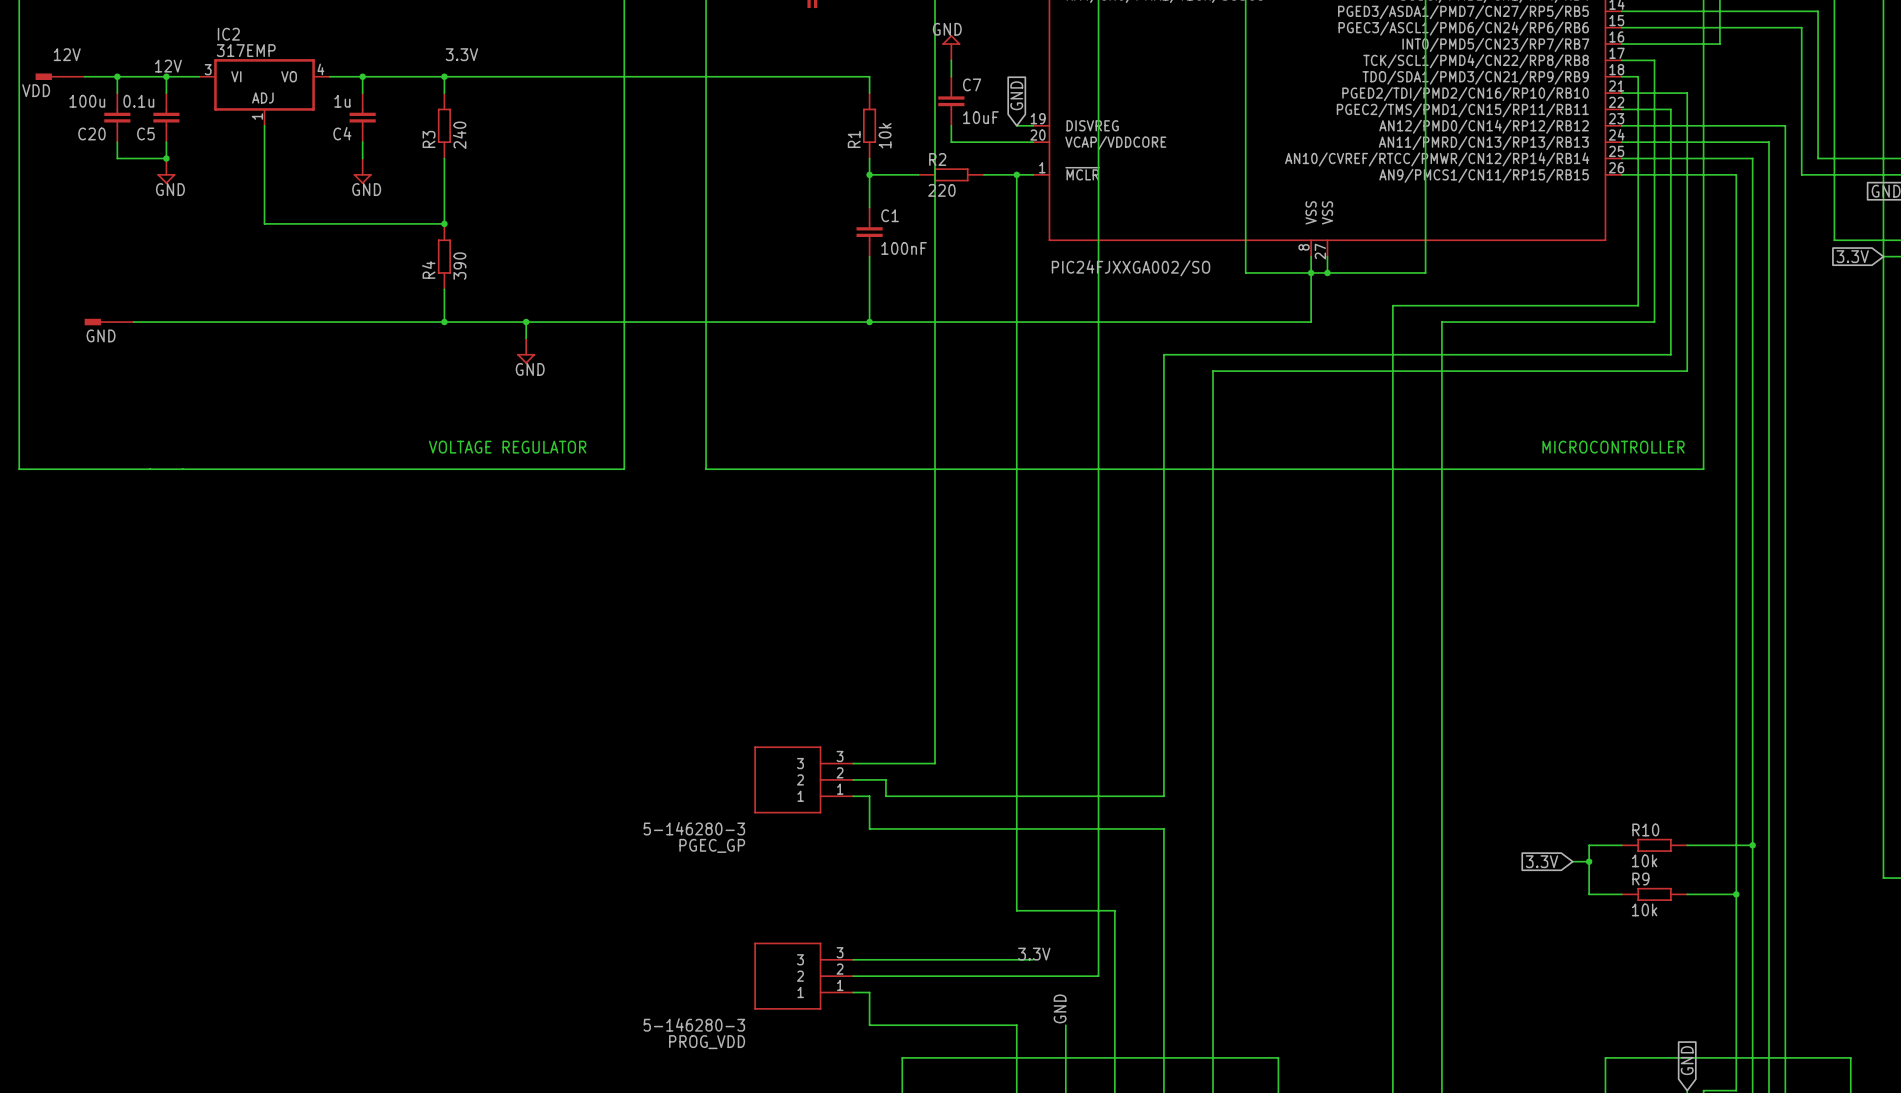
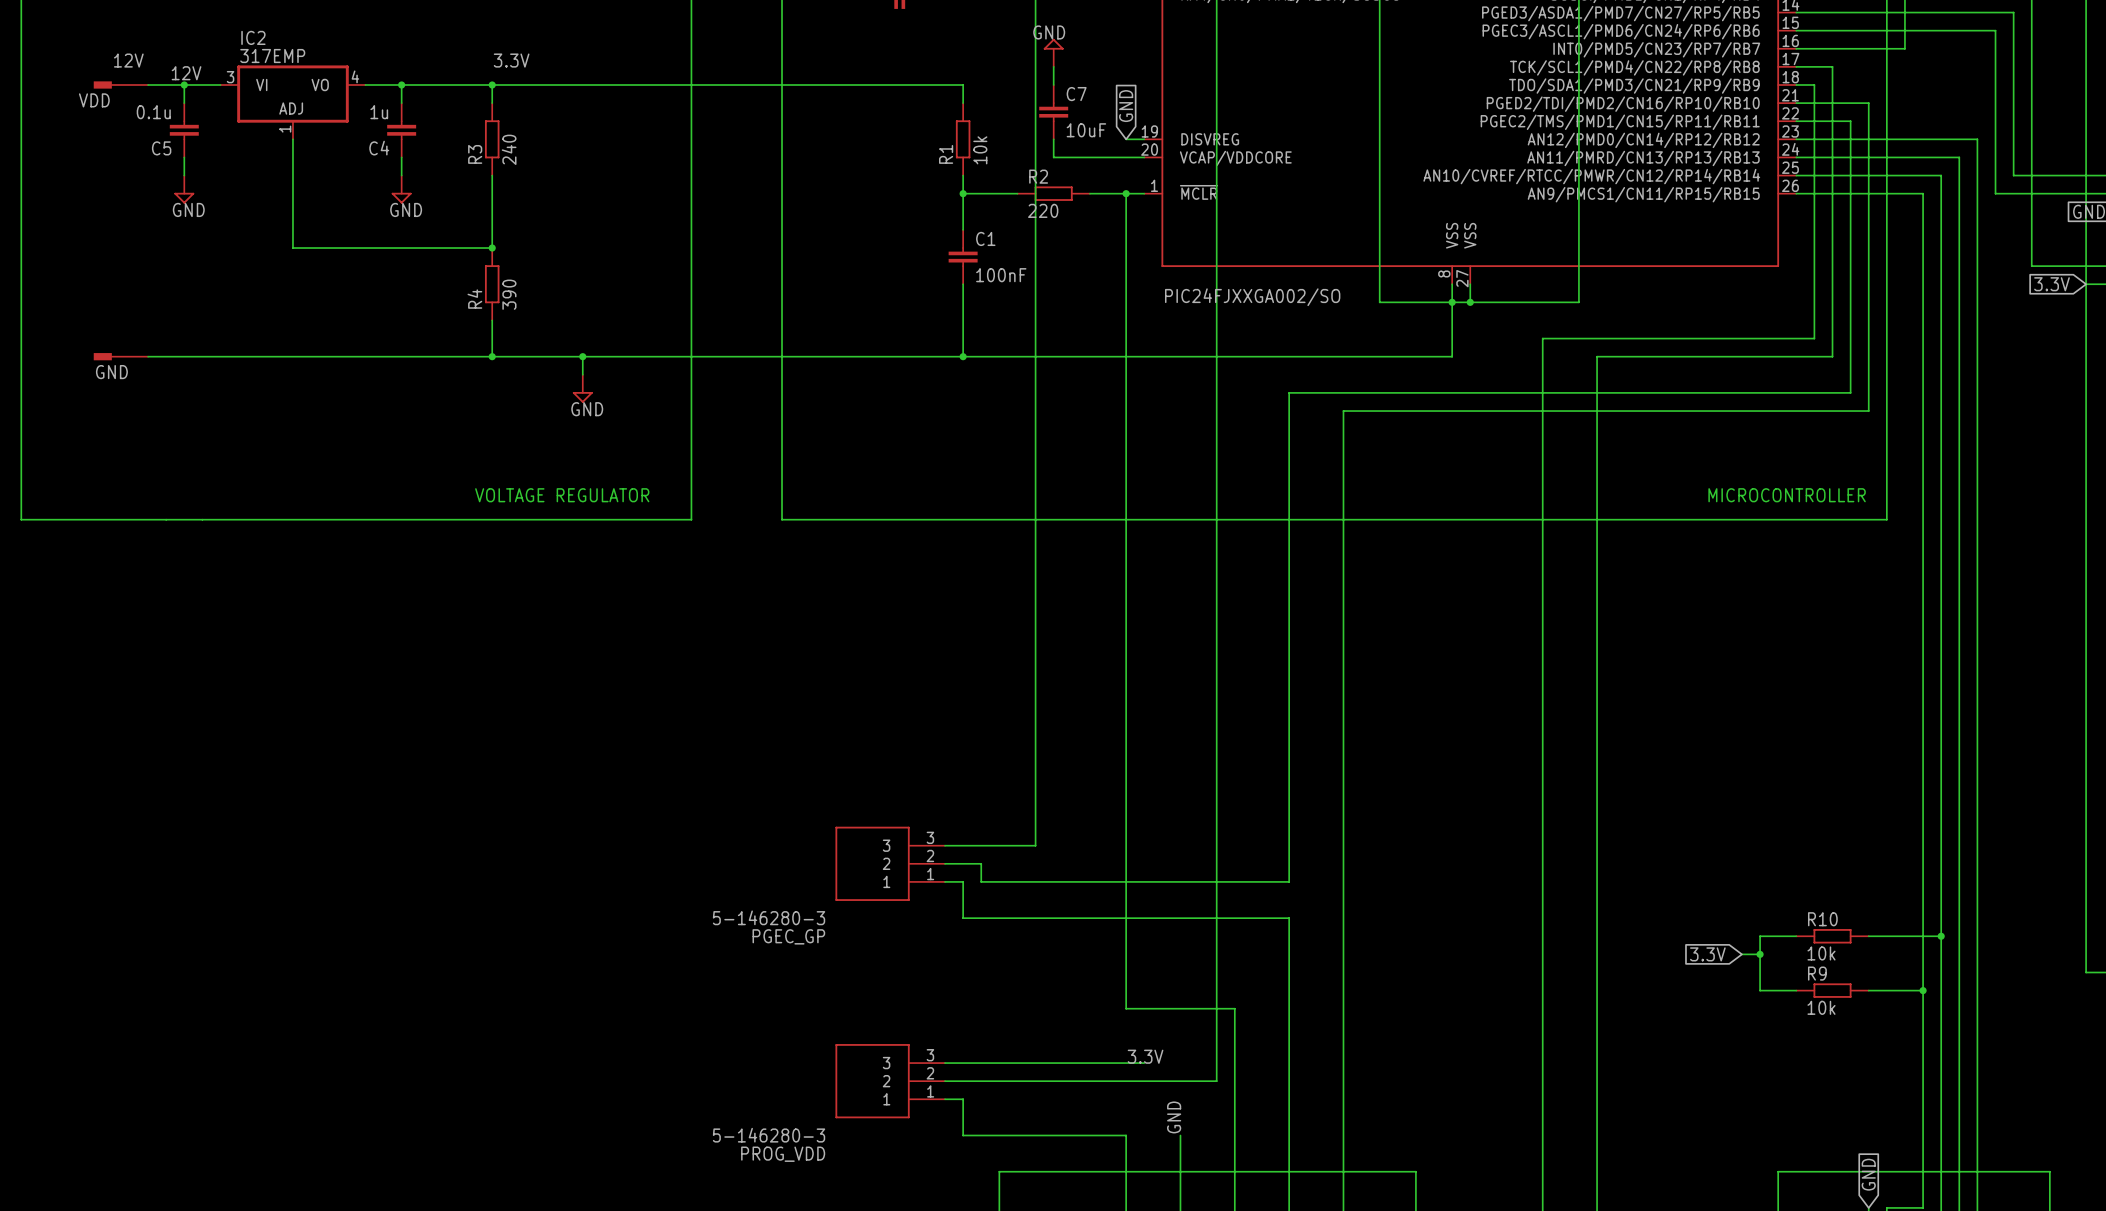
VDD position: (60, 76) -> (120, 85)
wire: (117, 76) (117, 93) -> none
junction: (117, 76) -> none
C20: 100u (117, 117) -> none
wire: (117, 142) (117, 158) (166, 158) -> none
junction: (166, 158) -> none

